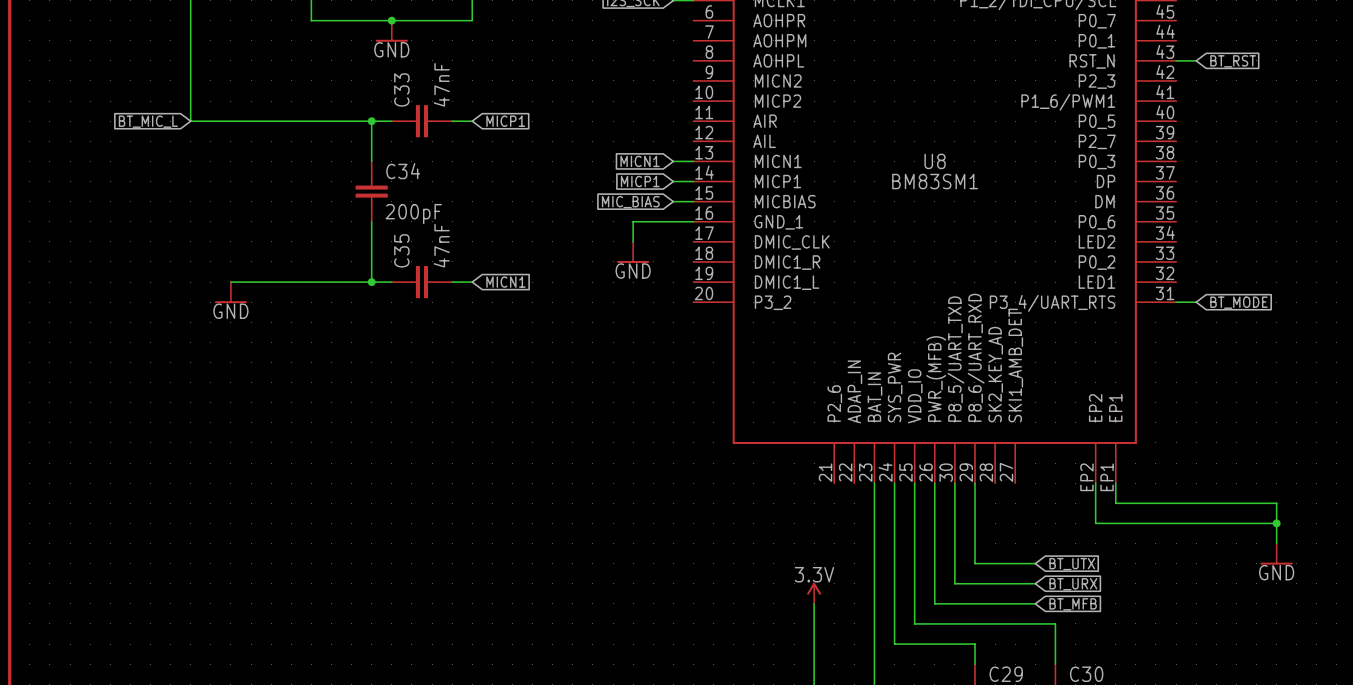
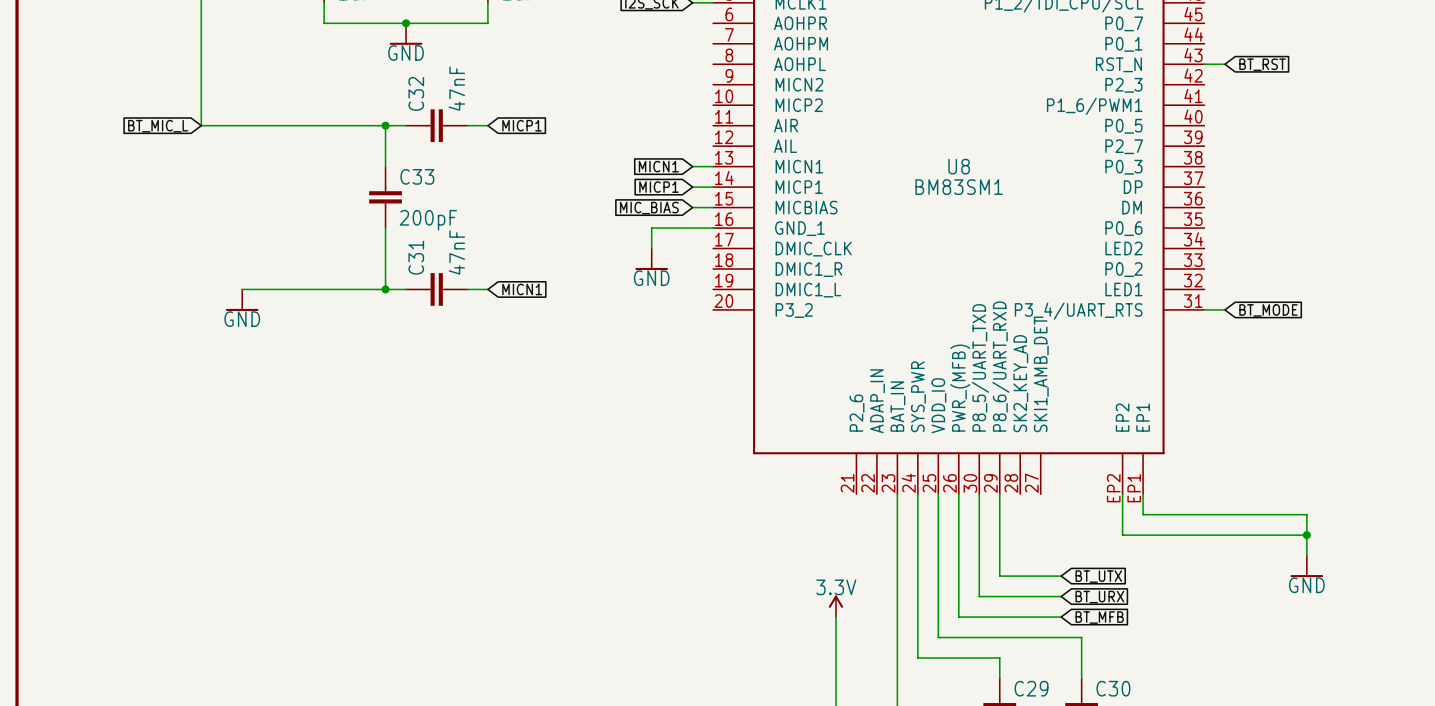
C33 name: C33 (401, 89) -> C32 (416, 93)
C34 name: C34 (403, 171) -> C33 (417, 176)
C35 name: C35 (401, 250) -> C31 (416, 257)

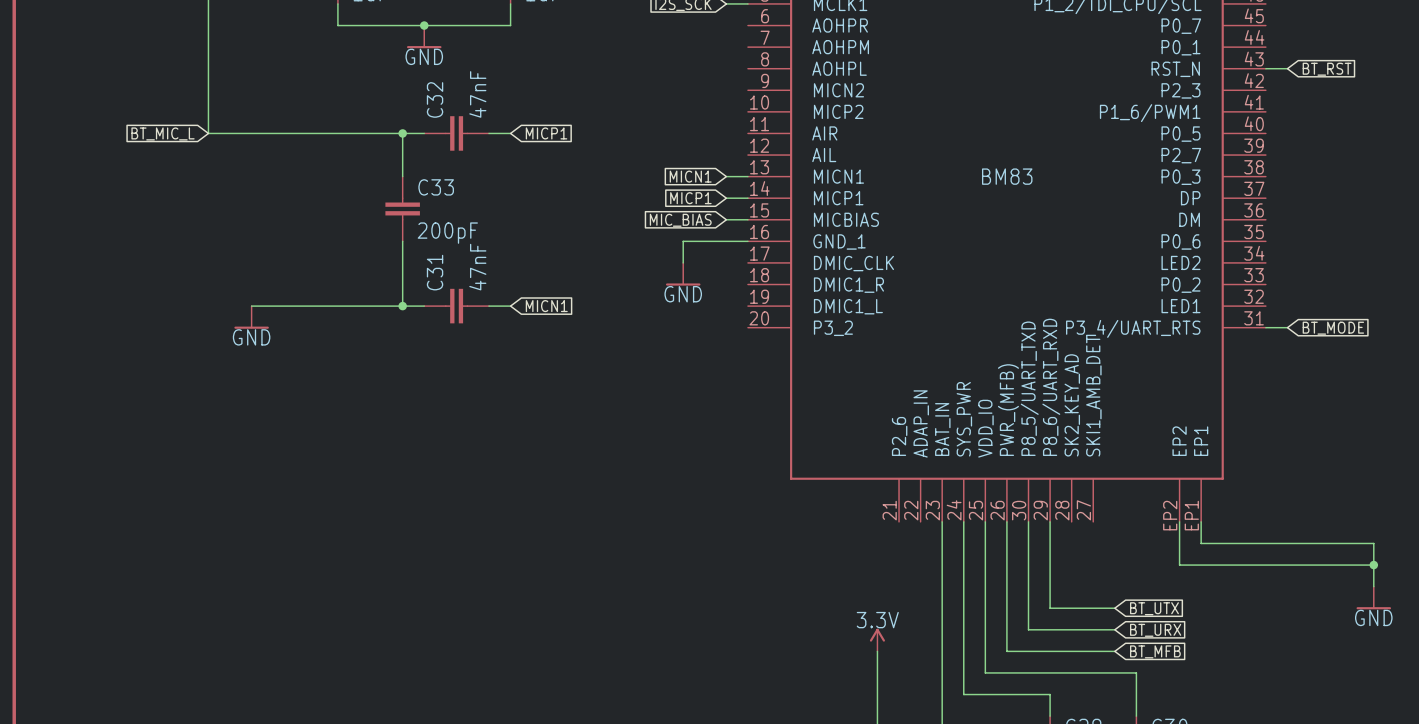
U8 name: U8 (959, 166) -> BM83 (1007, 176)
U8 value: BM83SM1 (959, 187) -> none

